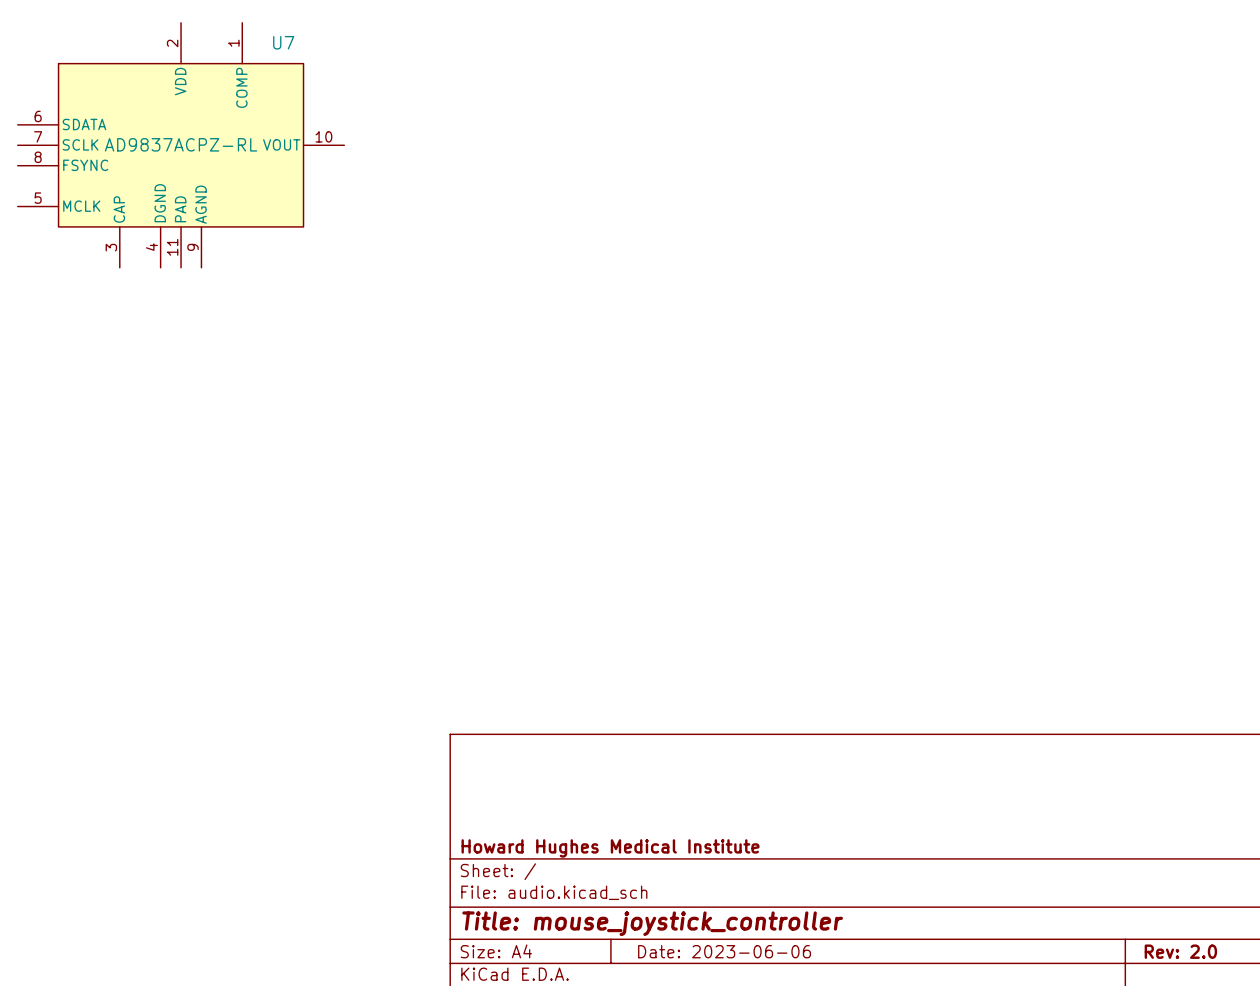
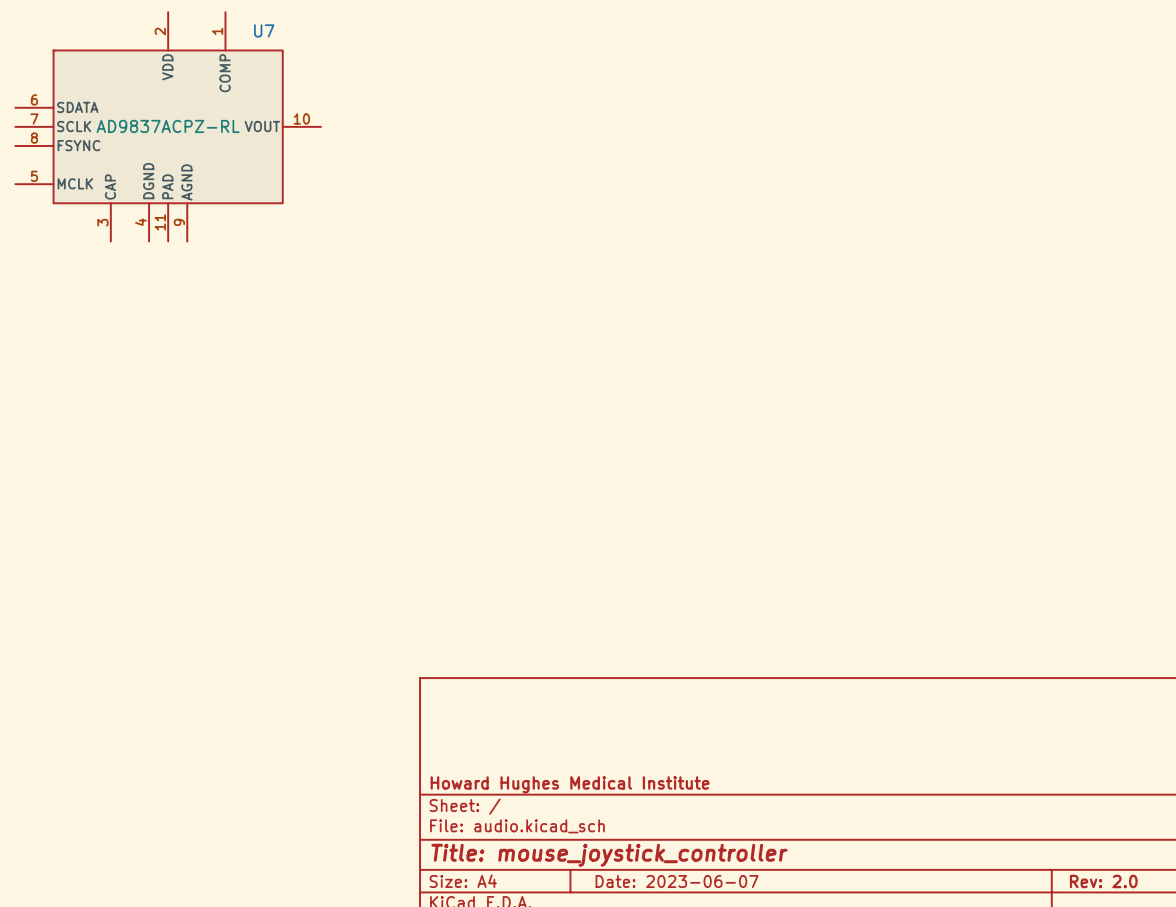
title block: Date: 2023-06-06 (724, 951) -> Date: 2023-06-07 (677, 881)

